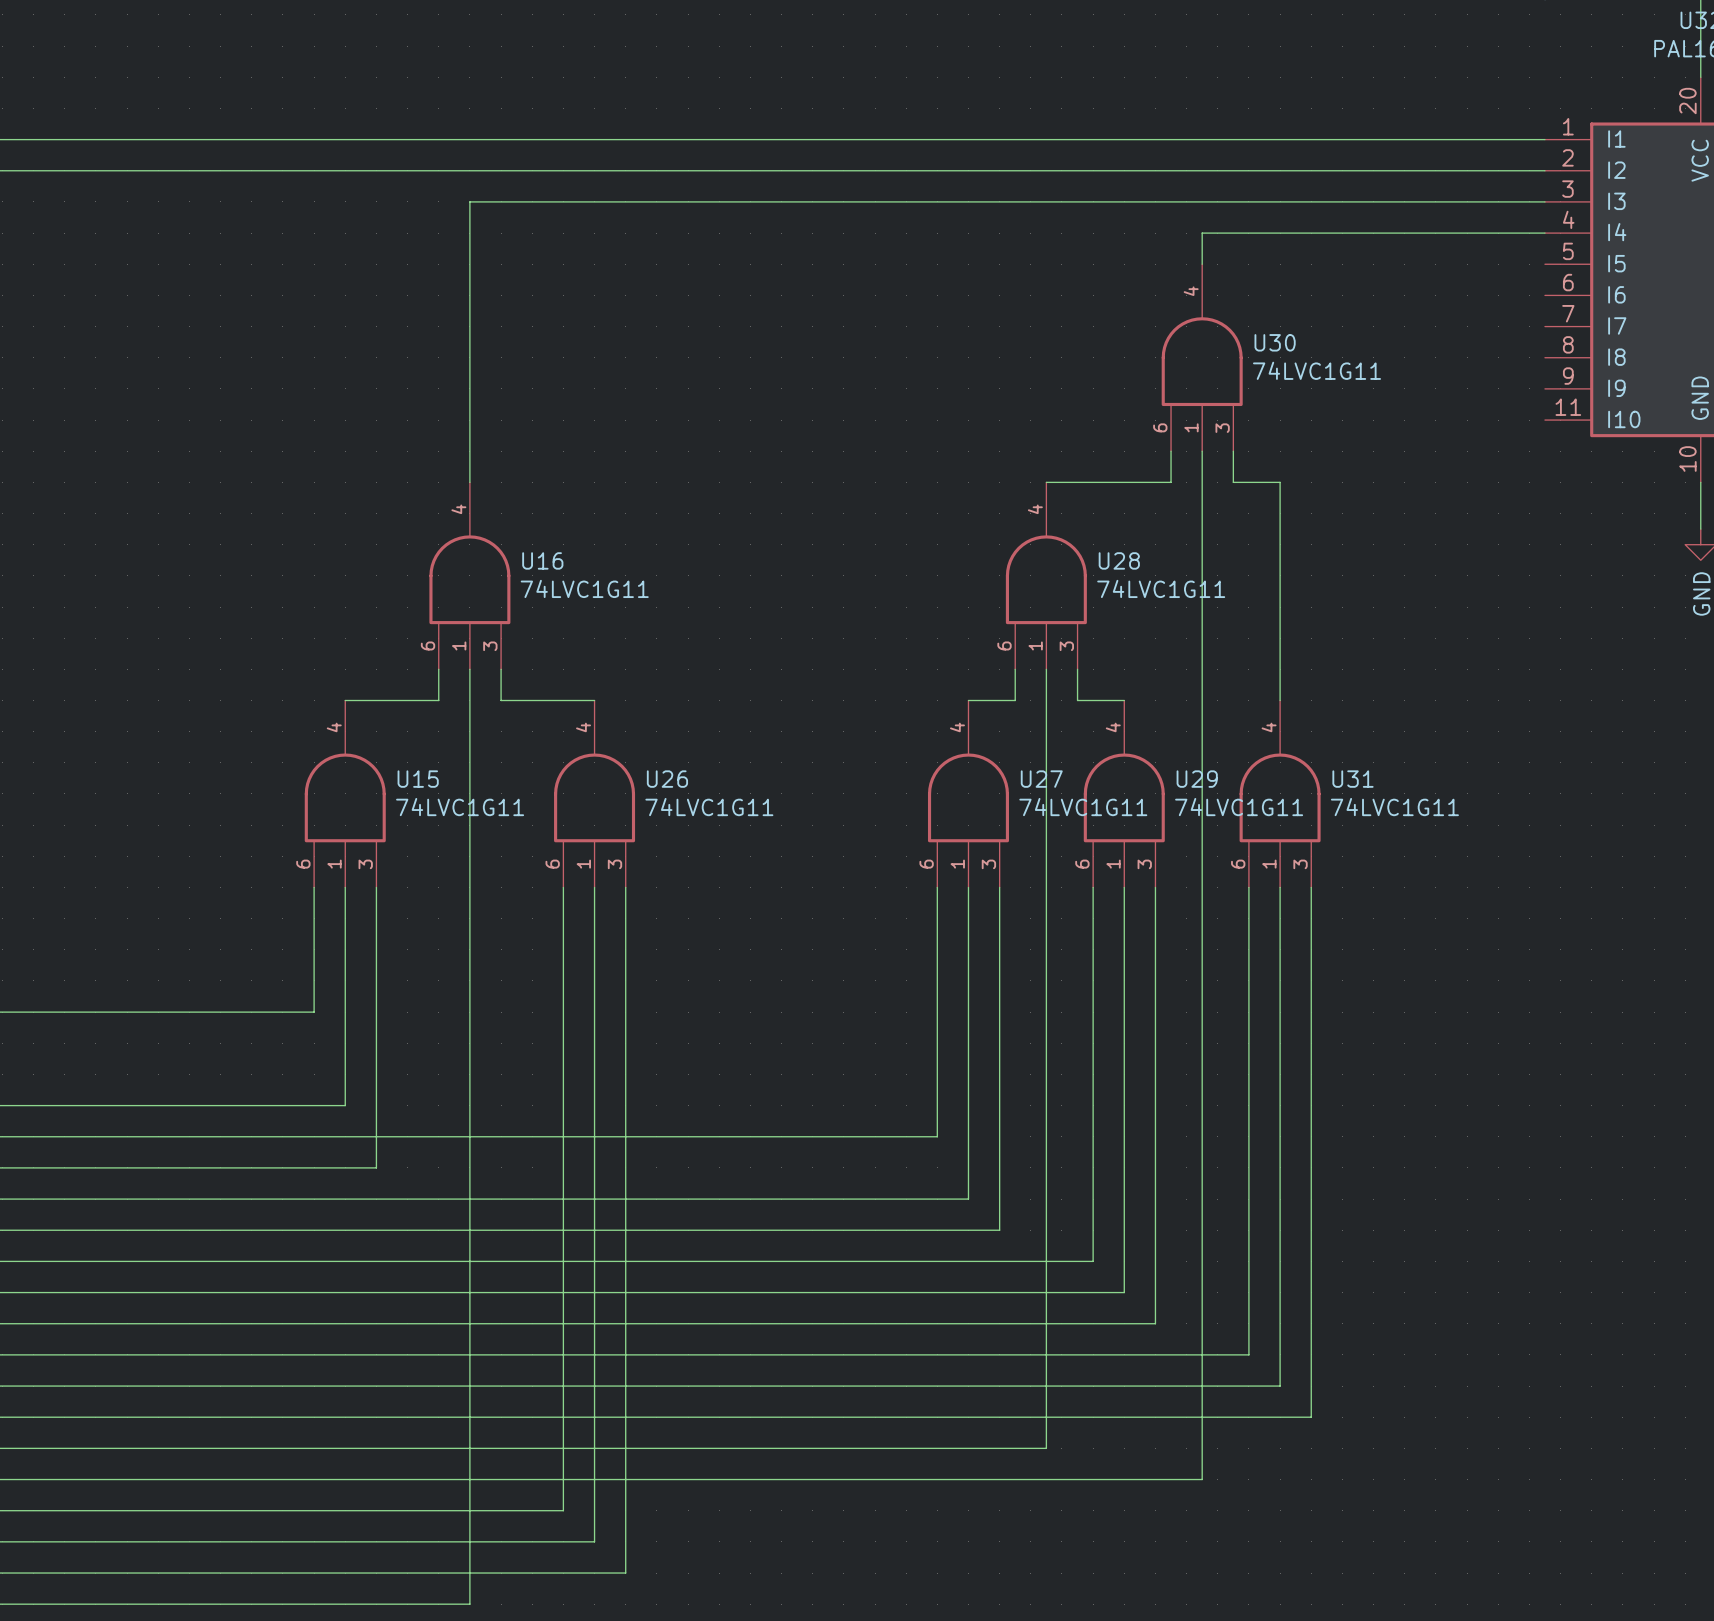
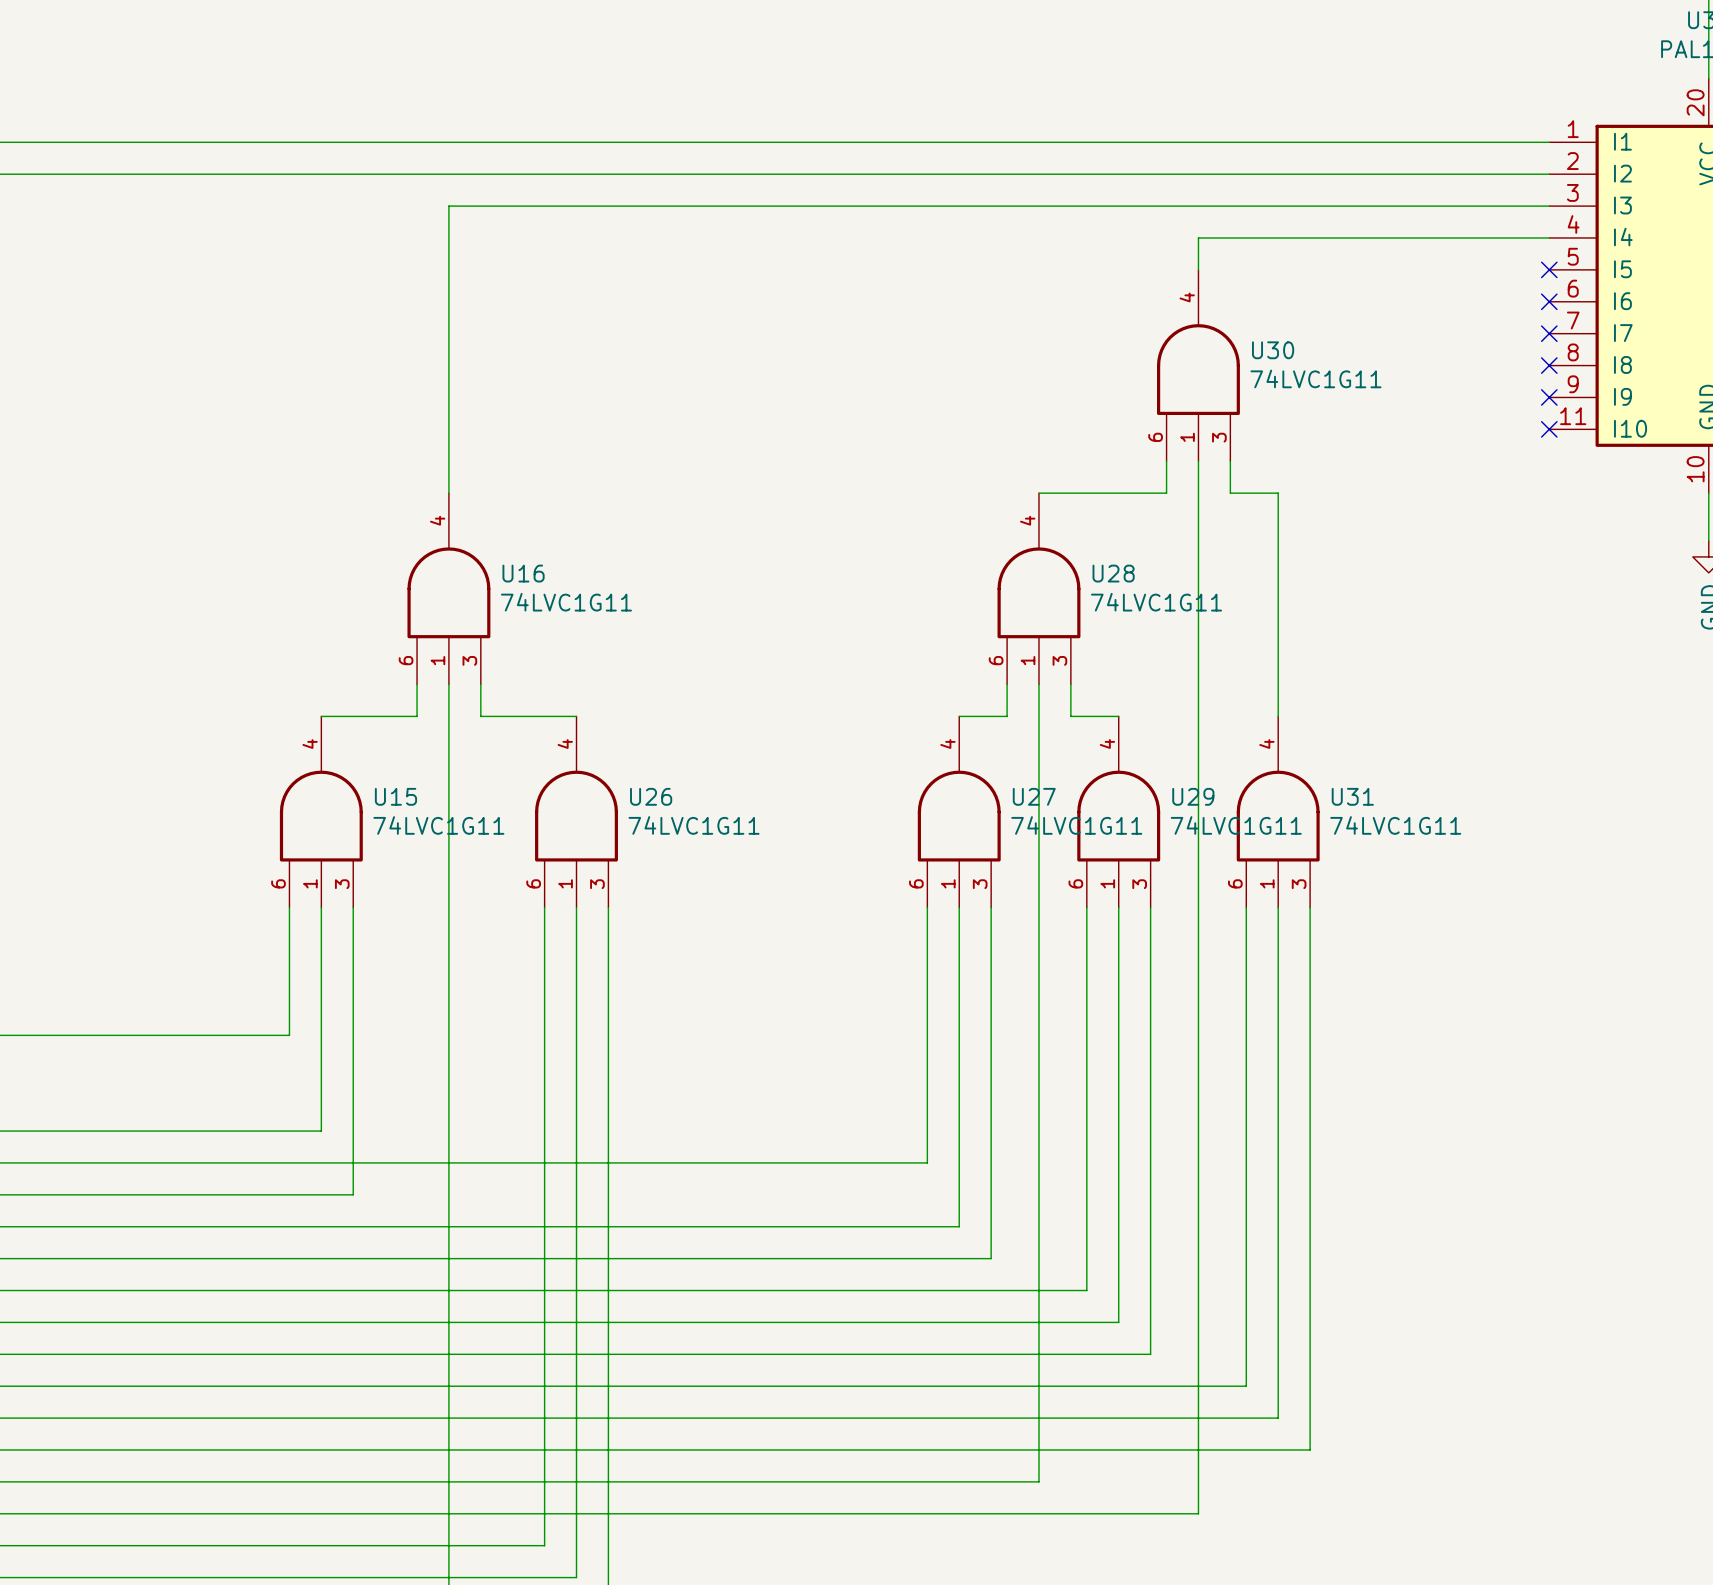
no-connect mark: none -> (1549, 269)
no-connect mark: none -> (1549, 301)
no-connect mark: none -> (1549, 333)
no-connect mark: none -> (1549, 365)
no-connect mark: none -> (1549, 397)
no-connect mark: none -> (1549, 429)

